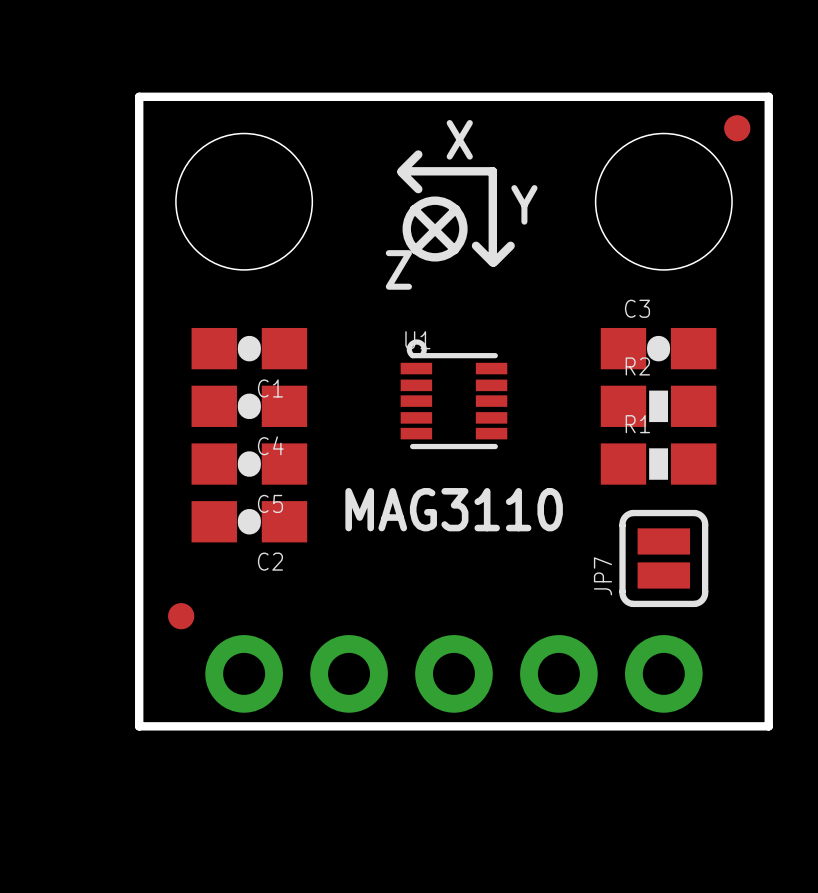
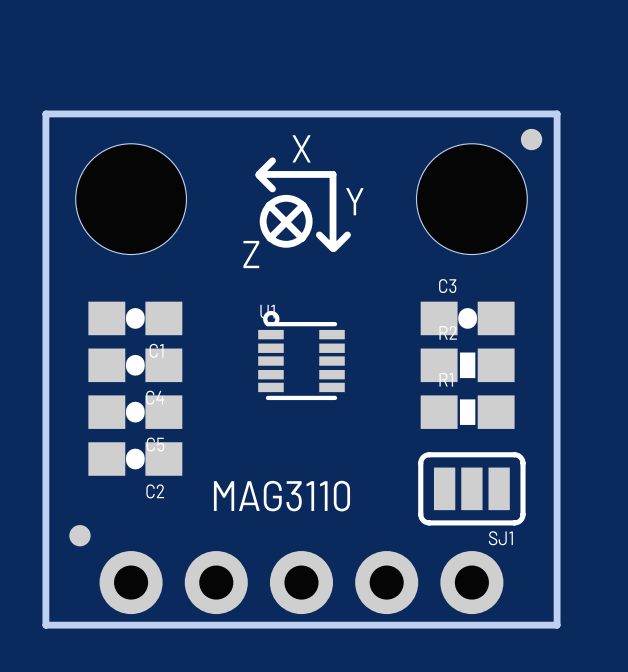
text position: MAG3110 (454, 509) -> MAG3110 (281, 496)
JP7: (663, 558) -> none
SJ1: none -> (471, 488)

